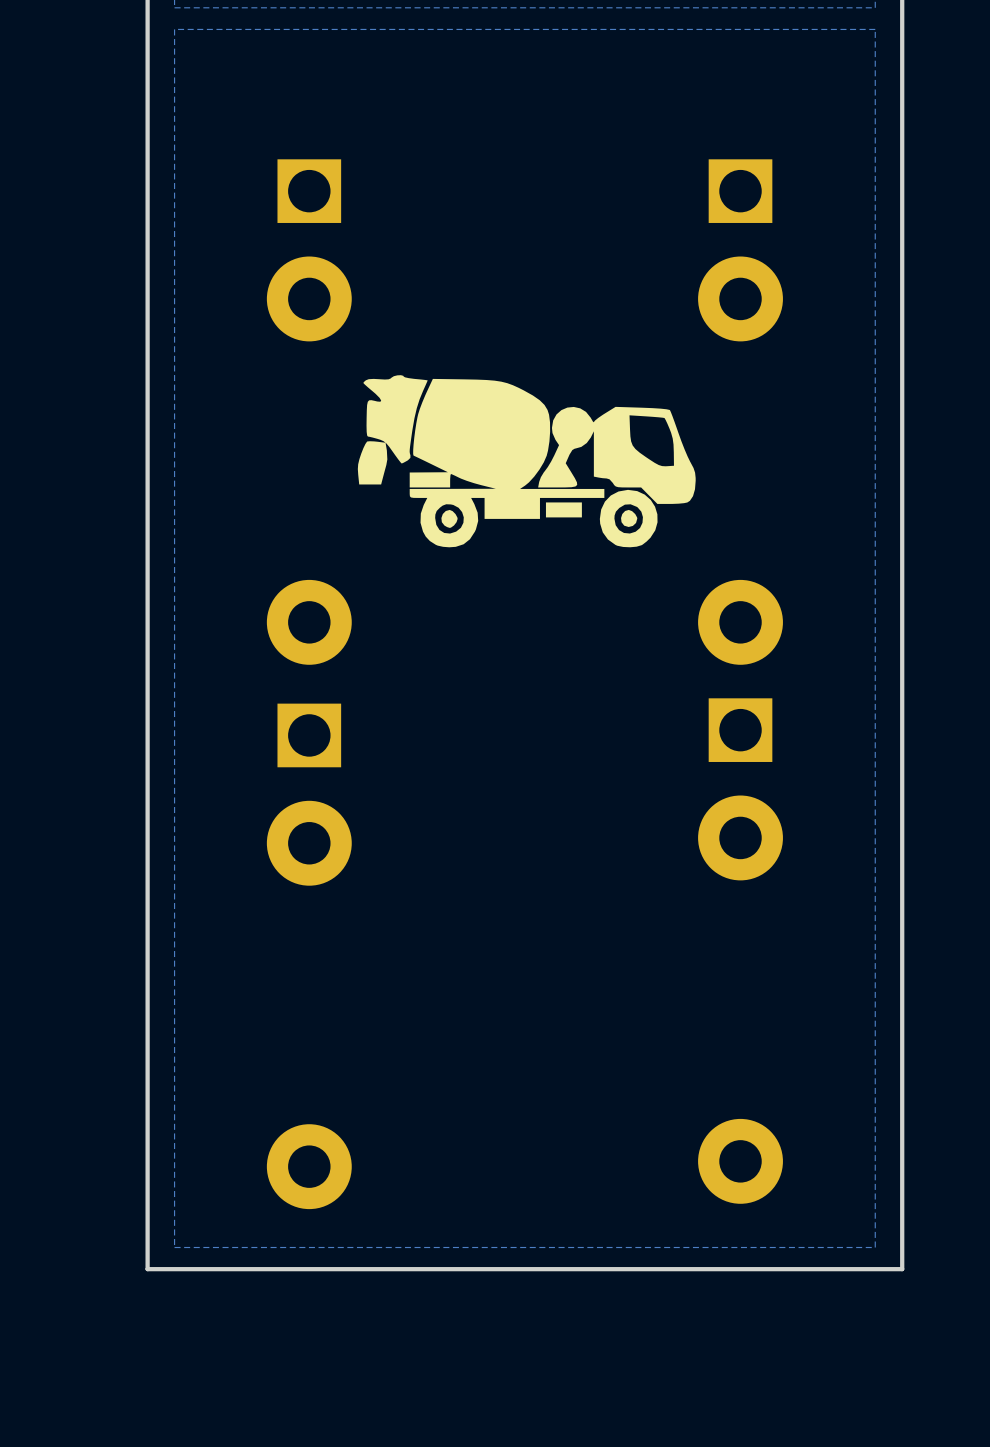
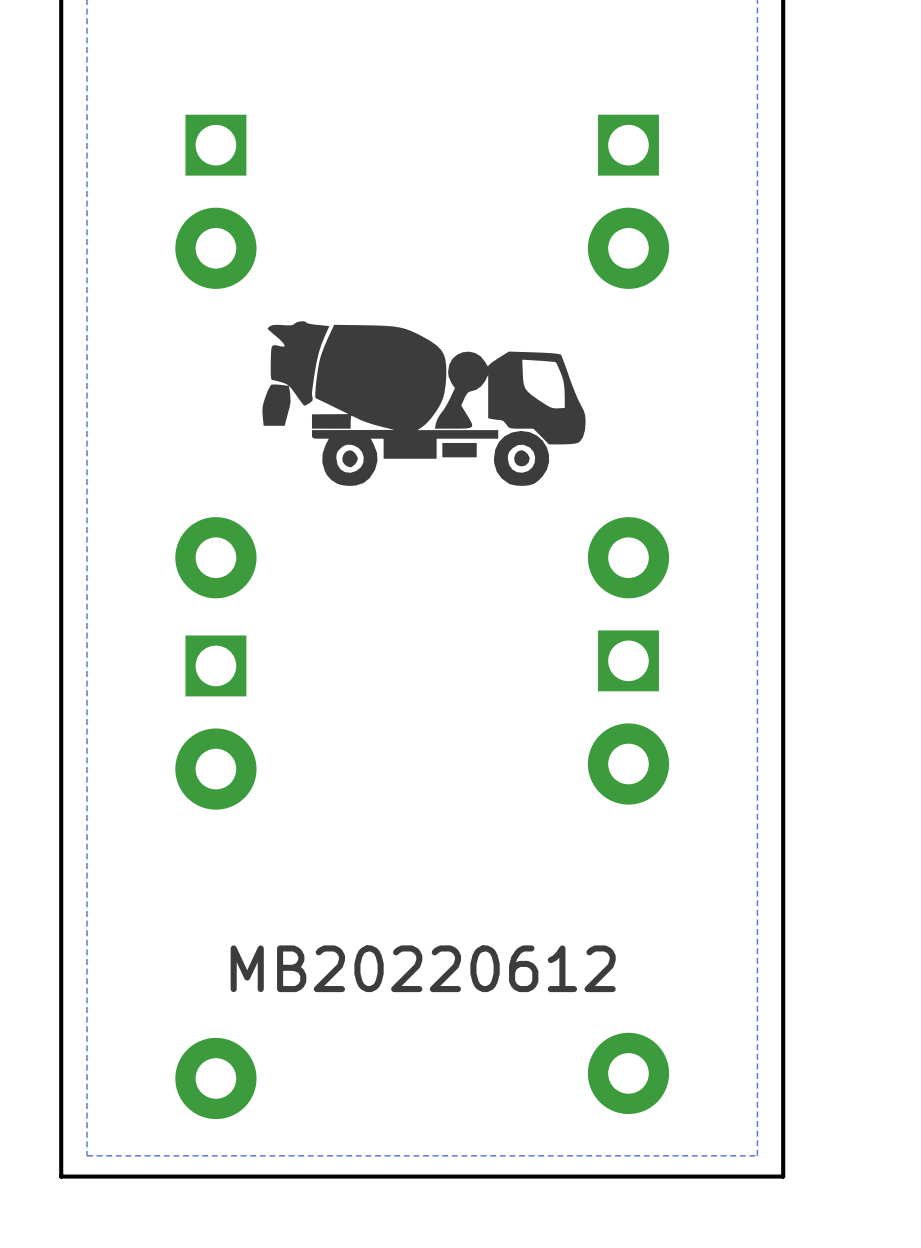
text: none -> MB20220612 (423, 968)

